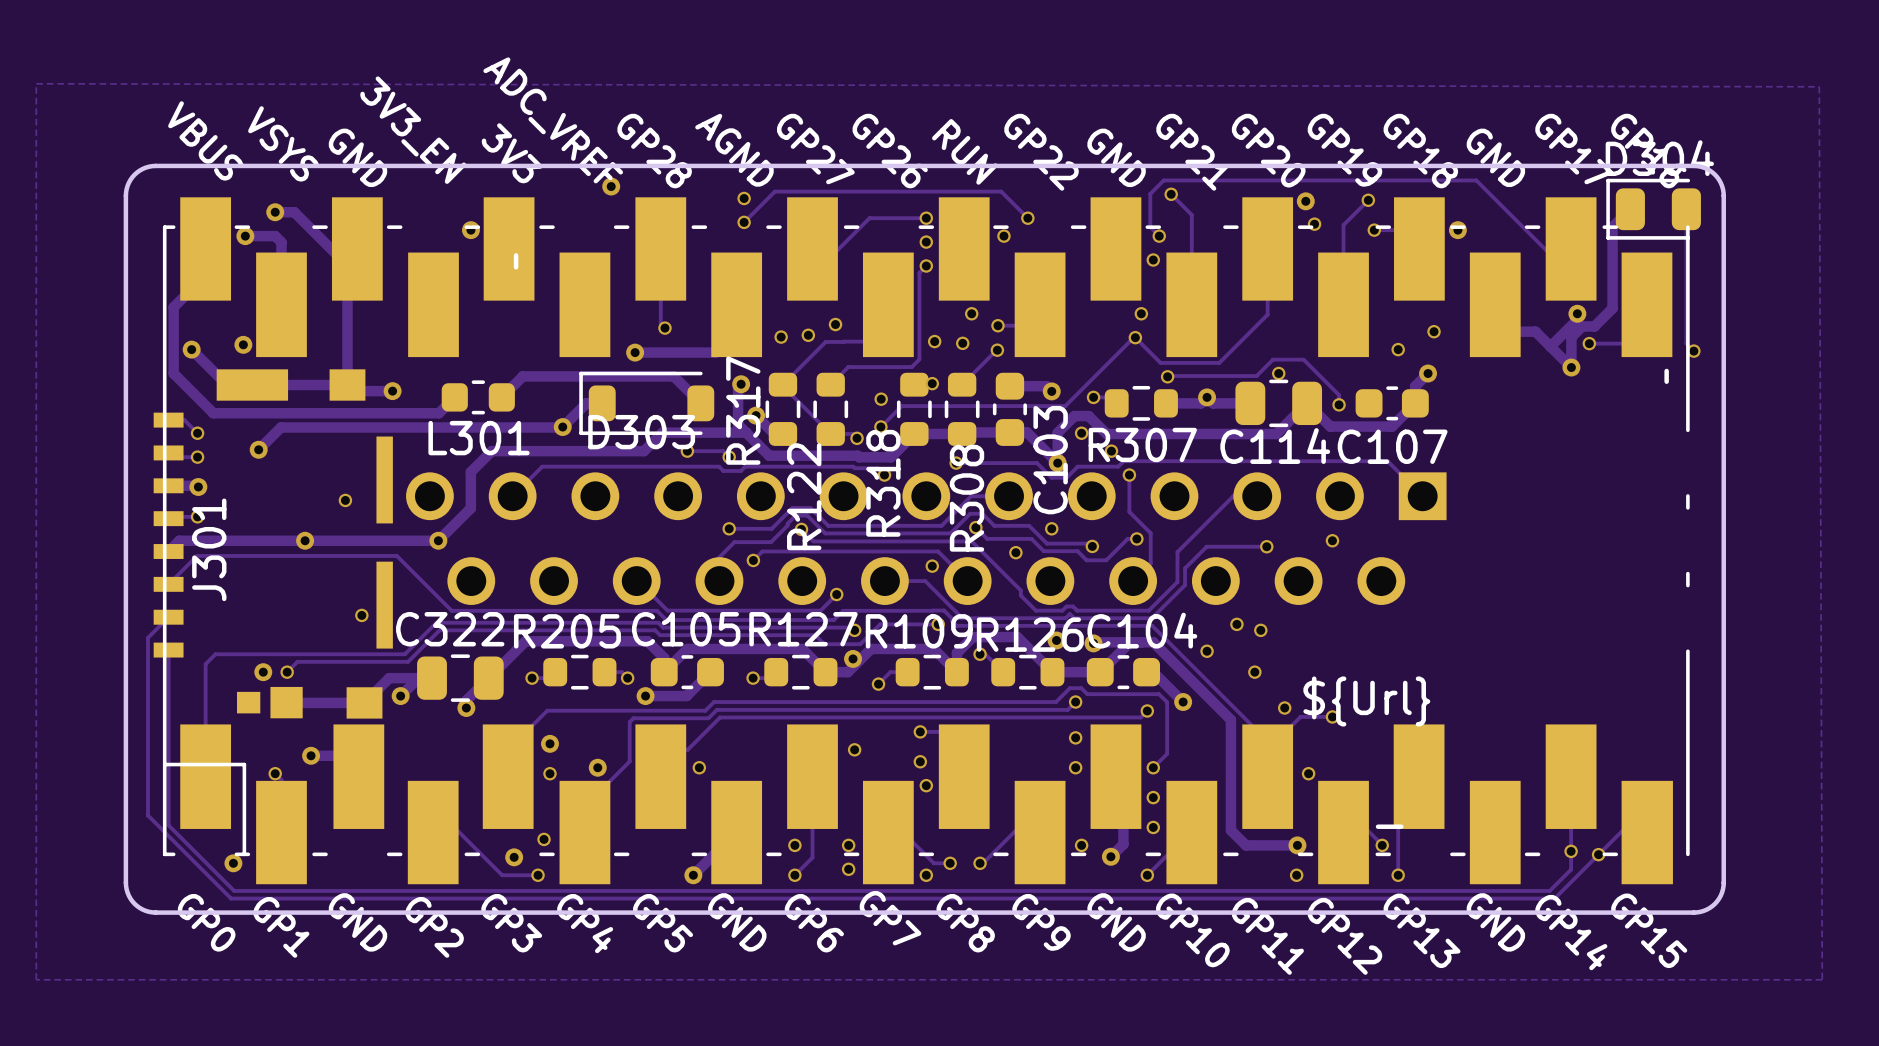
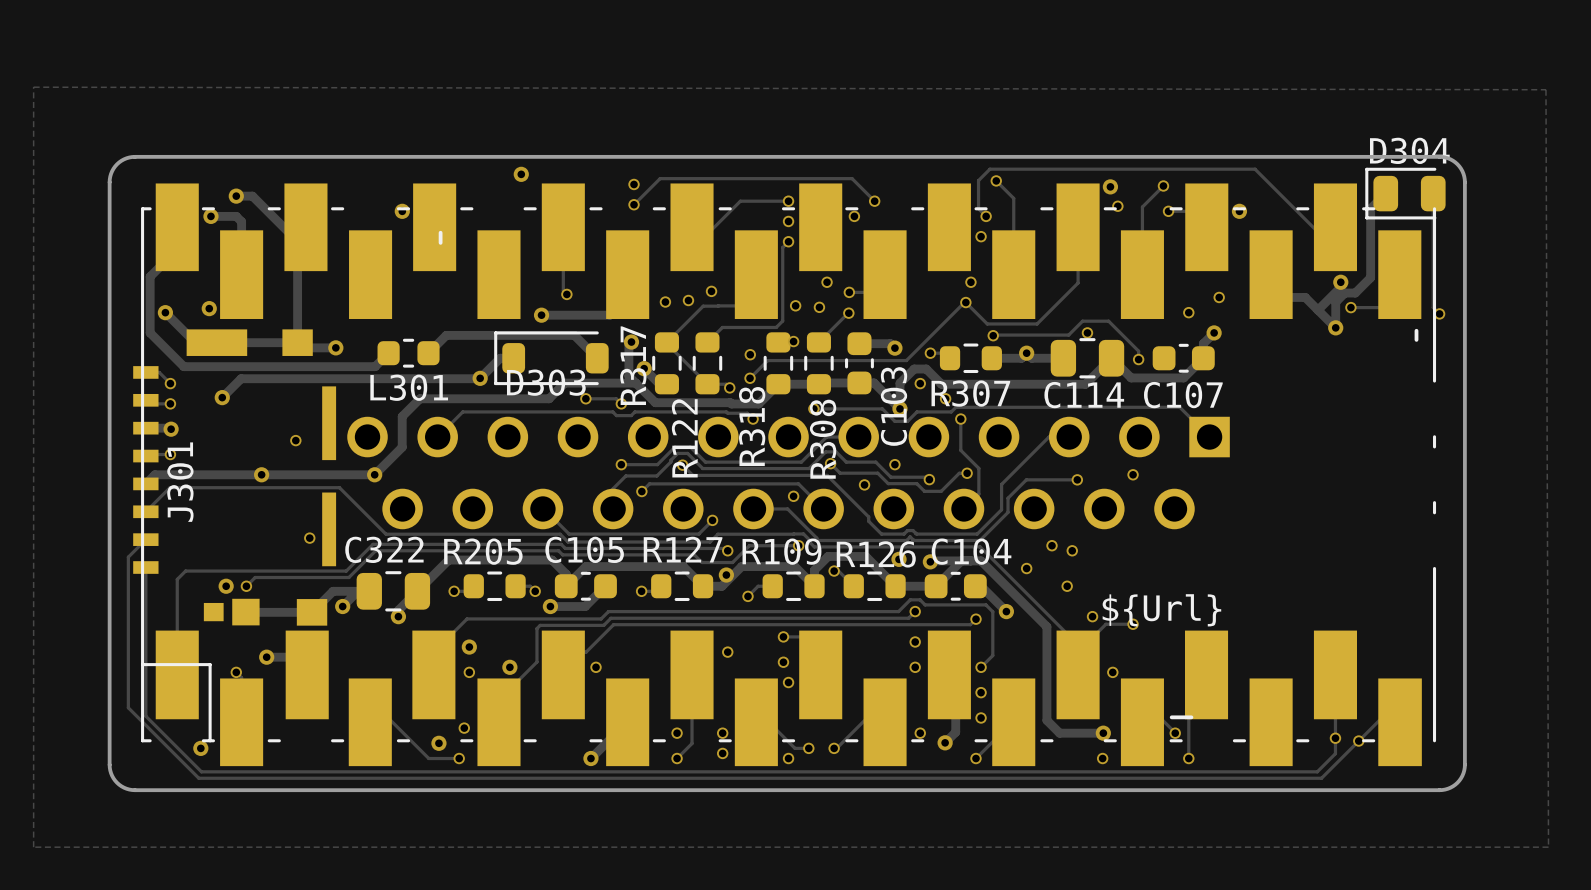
part footprint: [162, 197, 1690, 885] -> [141, 183, 1437, 767]

